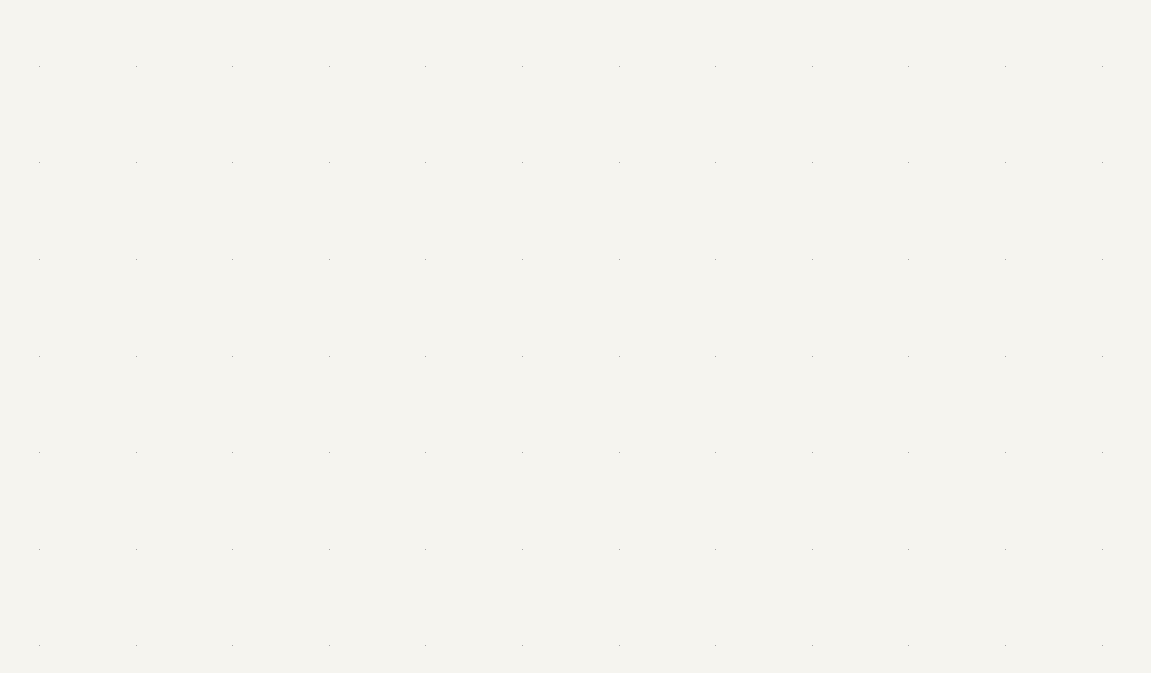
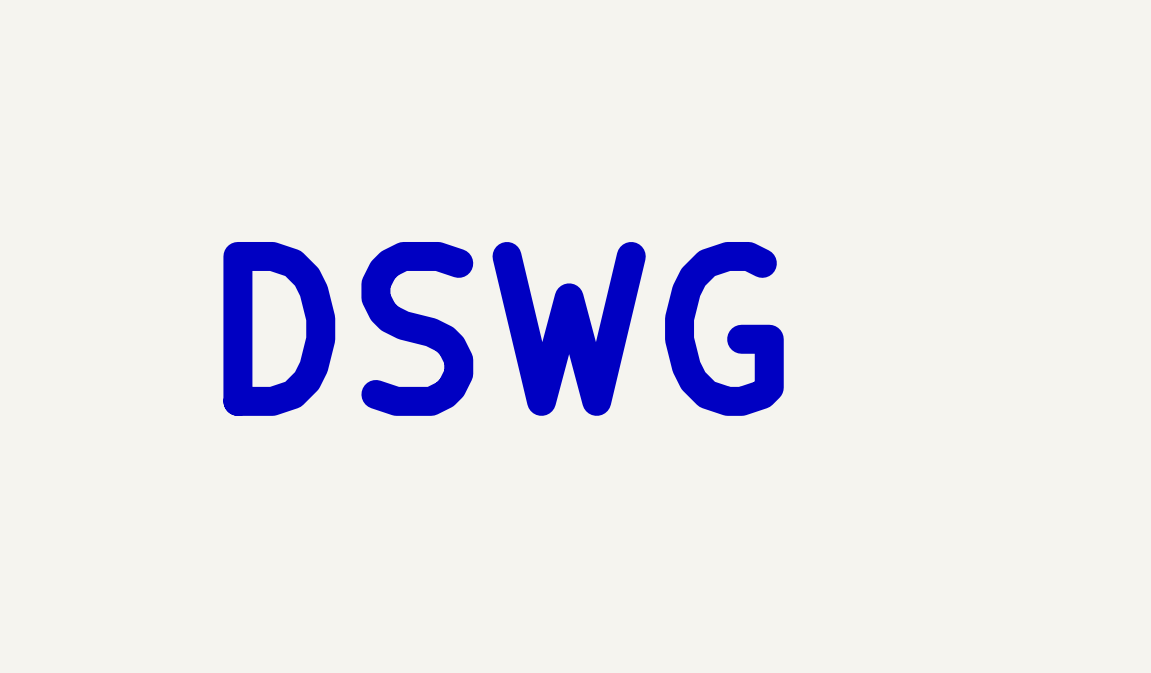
text: none -> DSWG (503, 328)

